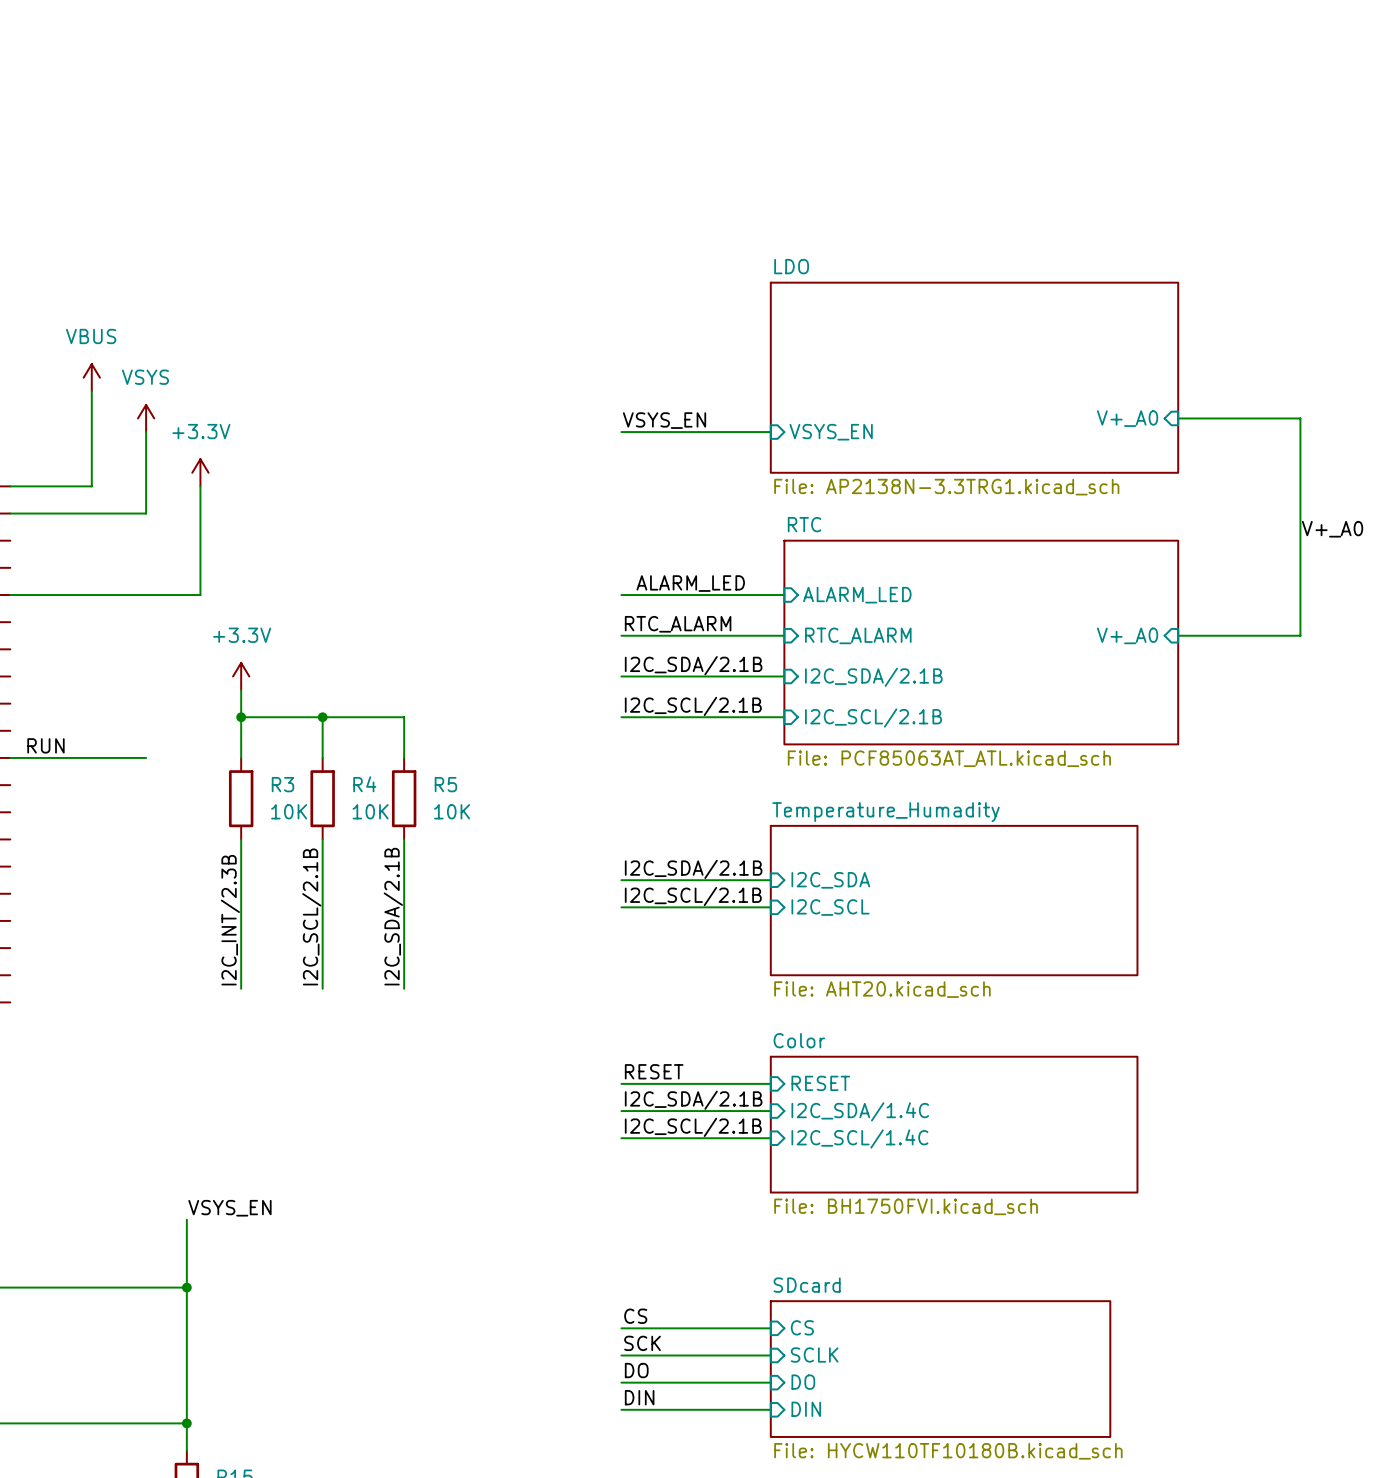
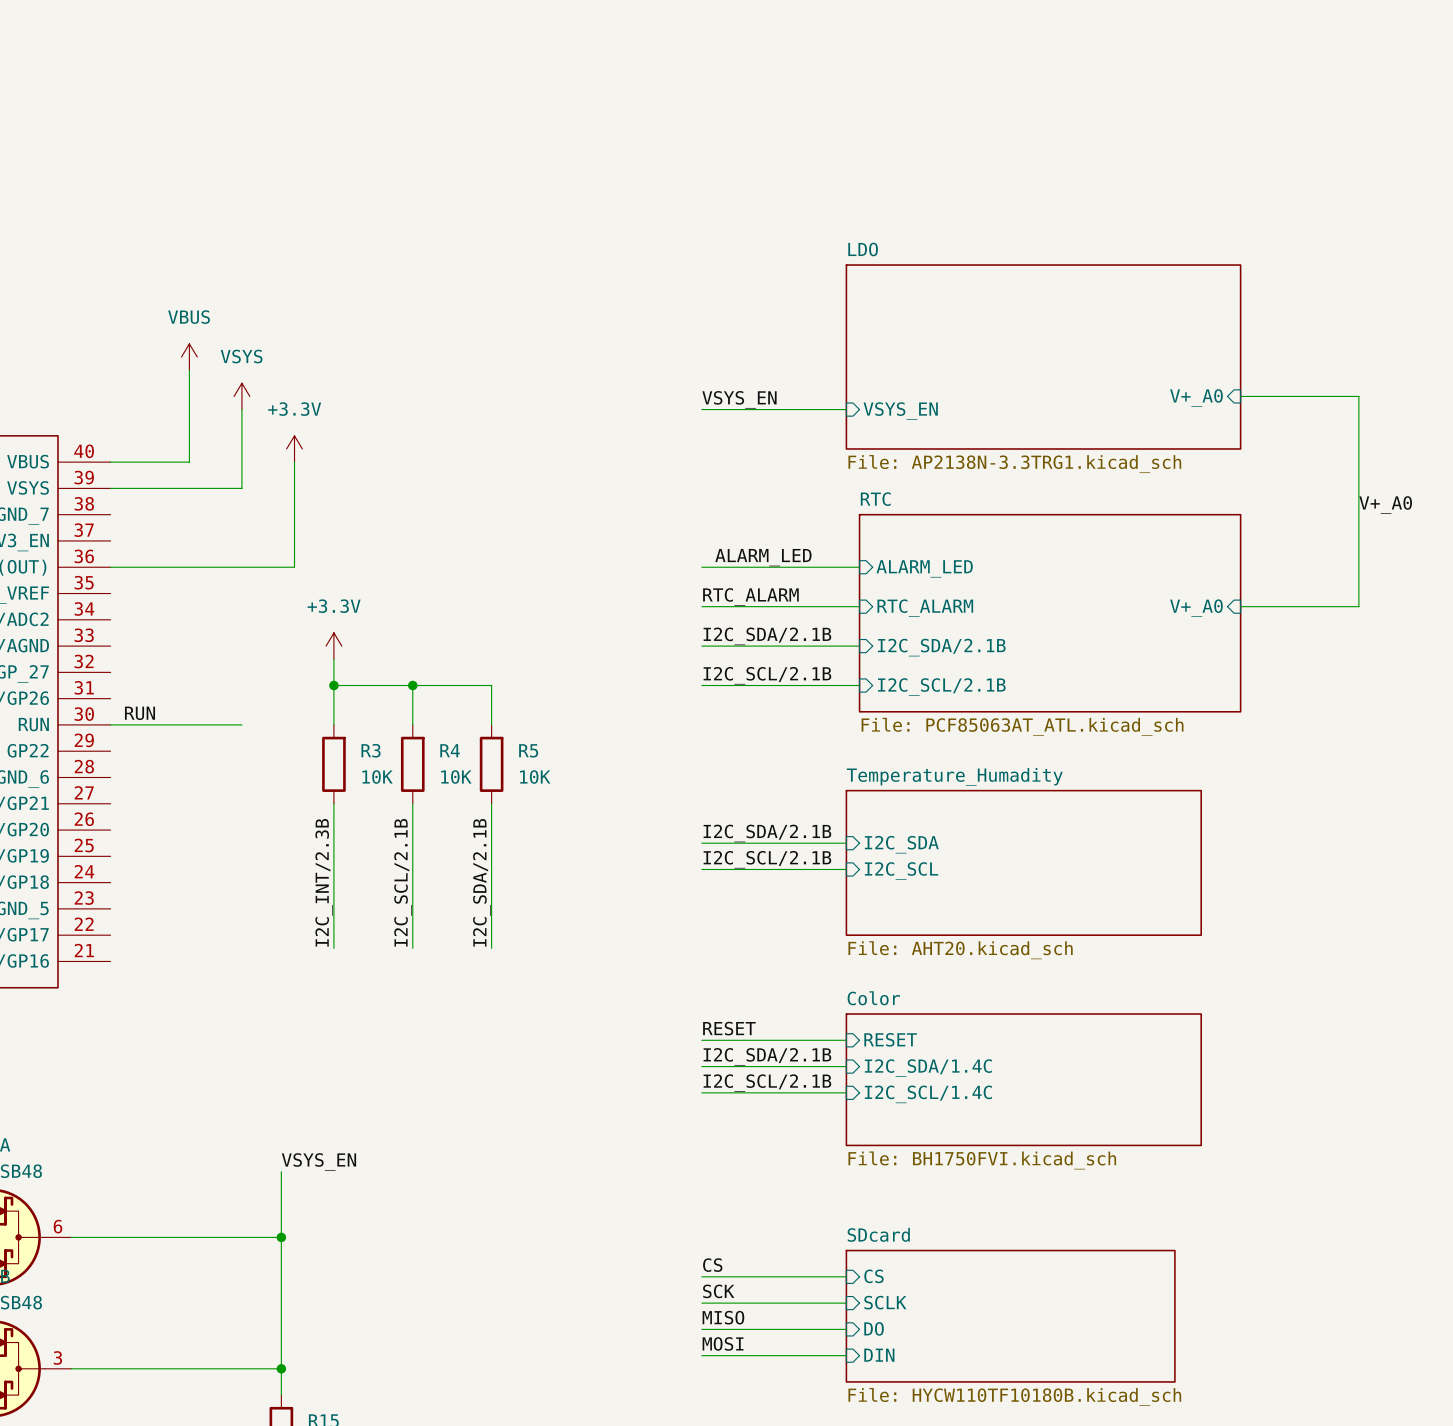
label: DO (636, 1370) -> MISO (723, 1317)
label: DIN (639, 1397) -> MOSI (723, 1343)

